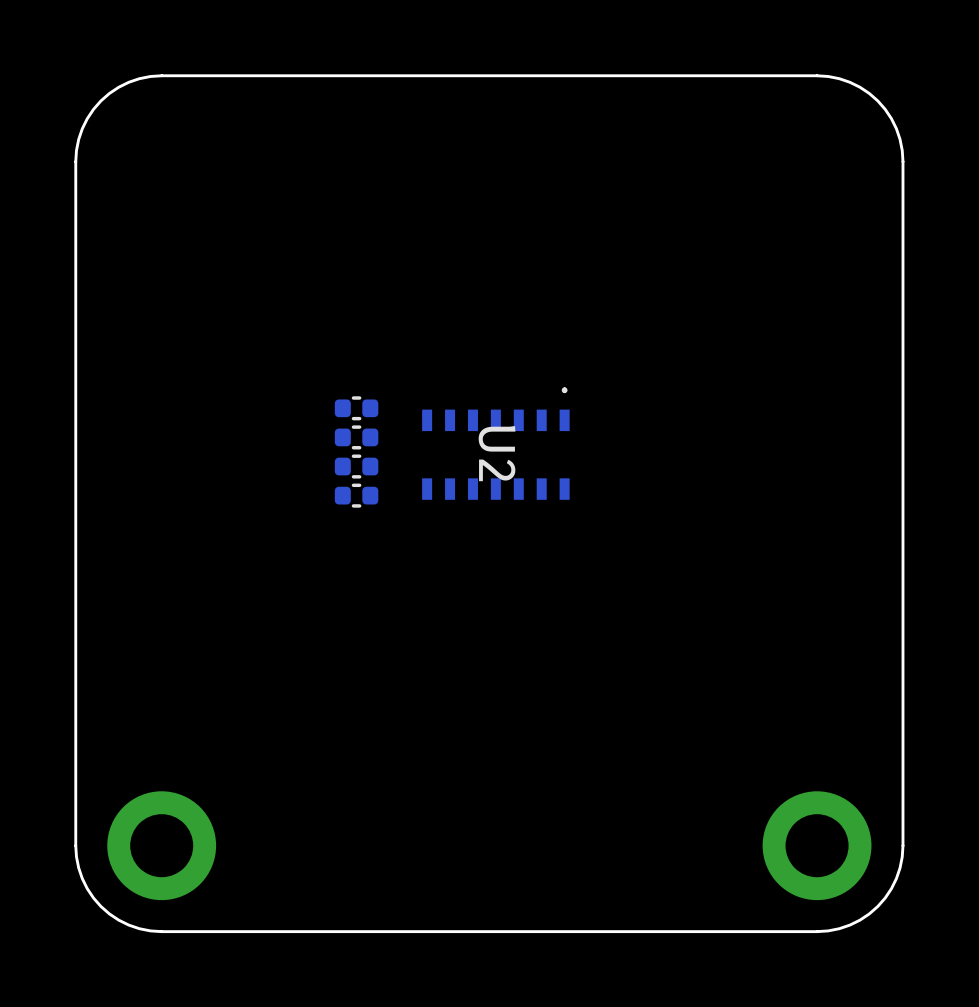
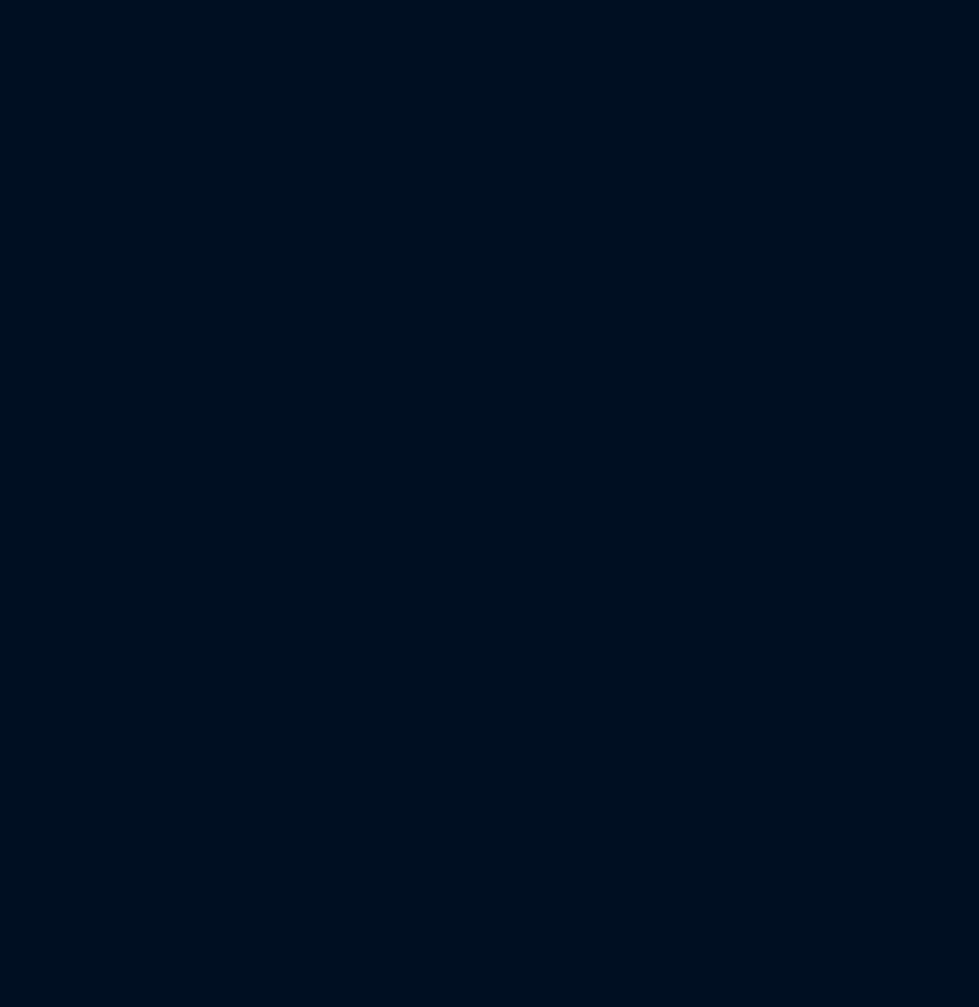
board edge: (817, 75) (161, 75) (139, 78) (118, 87) (93, 109) (82, 128) (75, 161) (75, 845) (78, 867) (87, 888) (109, 913) (139, 928) (161, 931) (817, 931) (839, 928) (860, 920) (885, 898) (896, 878) (902, 845) (902, 150) (896, 128) (877, 100) (849, 82) (817, 75) -> none
part: (356, 408) -> none
part: (356, 437) -> none
U2: (495, 443) -> none
part: (356, 466) -> none
part: (356, 495) -> none
part: (161, 845) -> none
part: (817, 845) -> none

